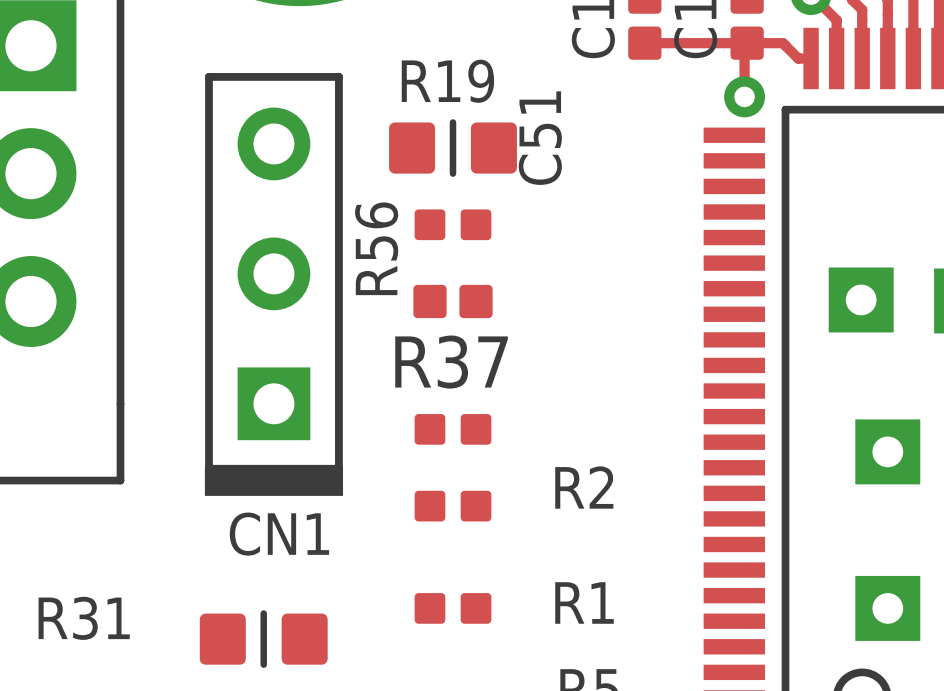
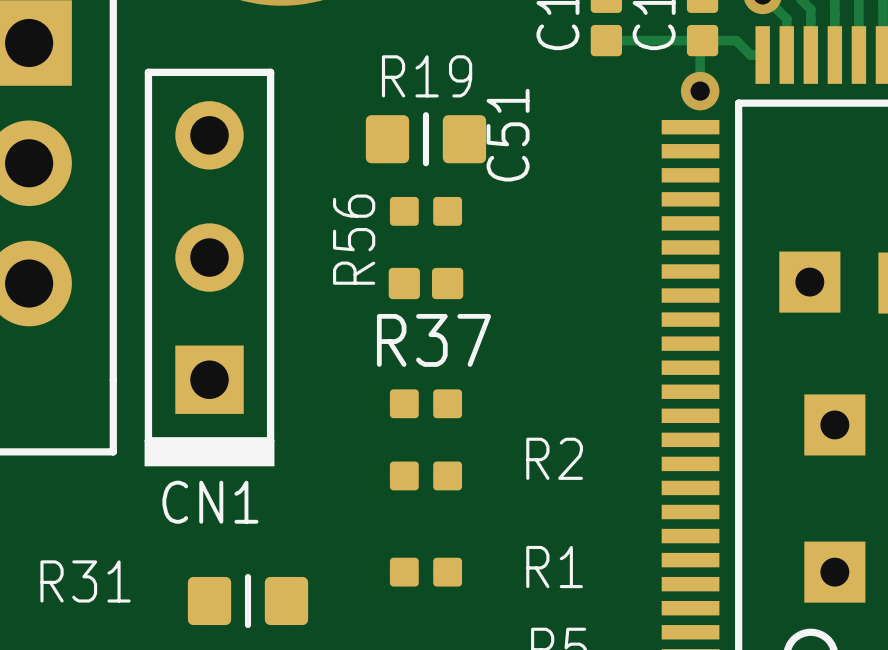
CN1 position: (273, 284) -> (209, 267)

